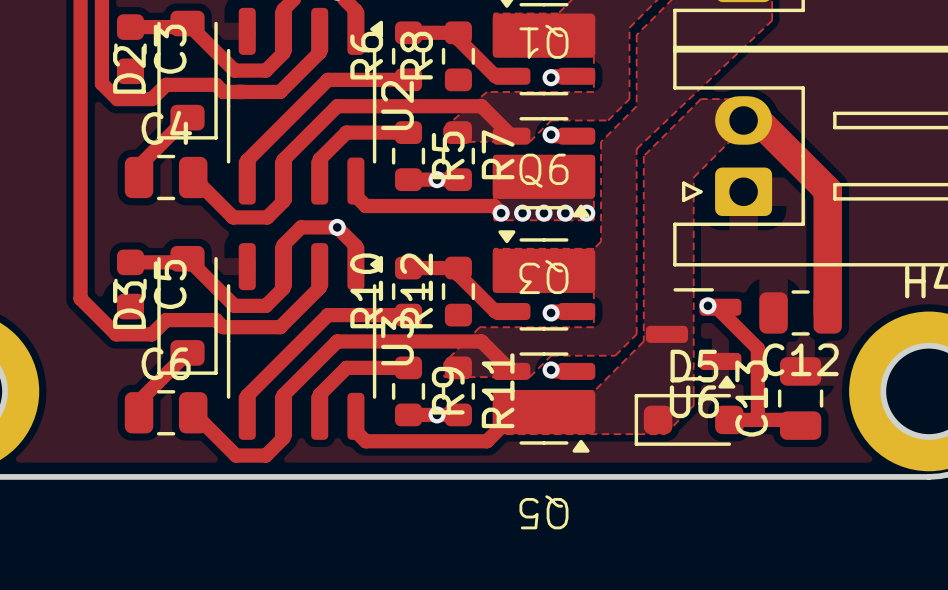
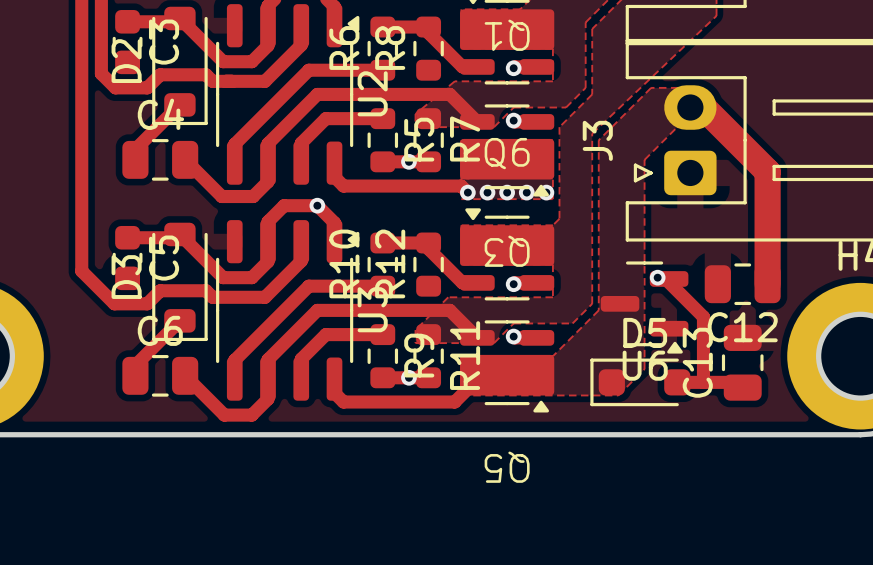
J3 name: none -> J3 (597, 140)

